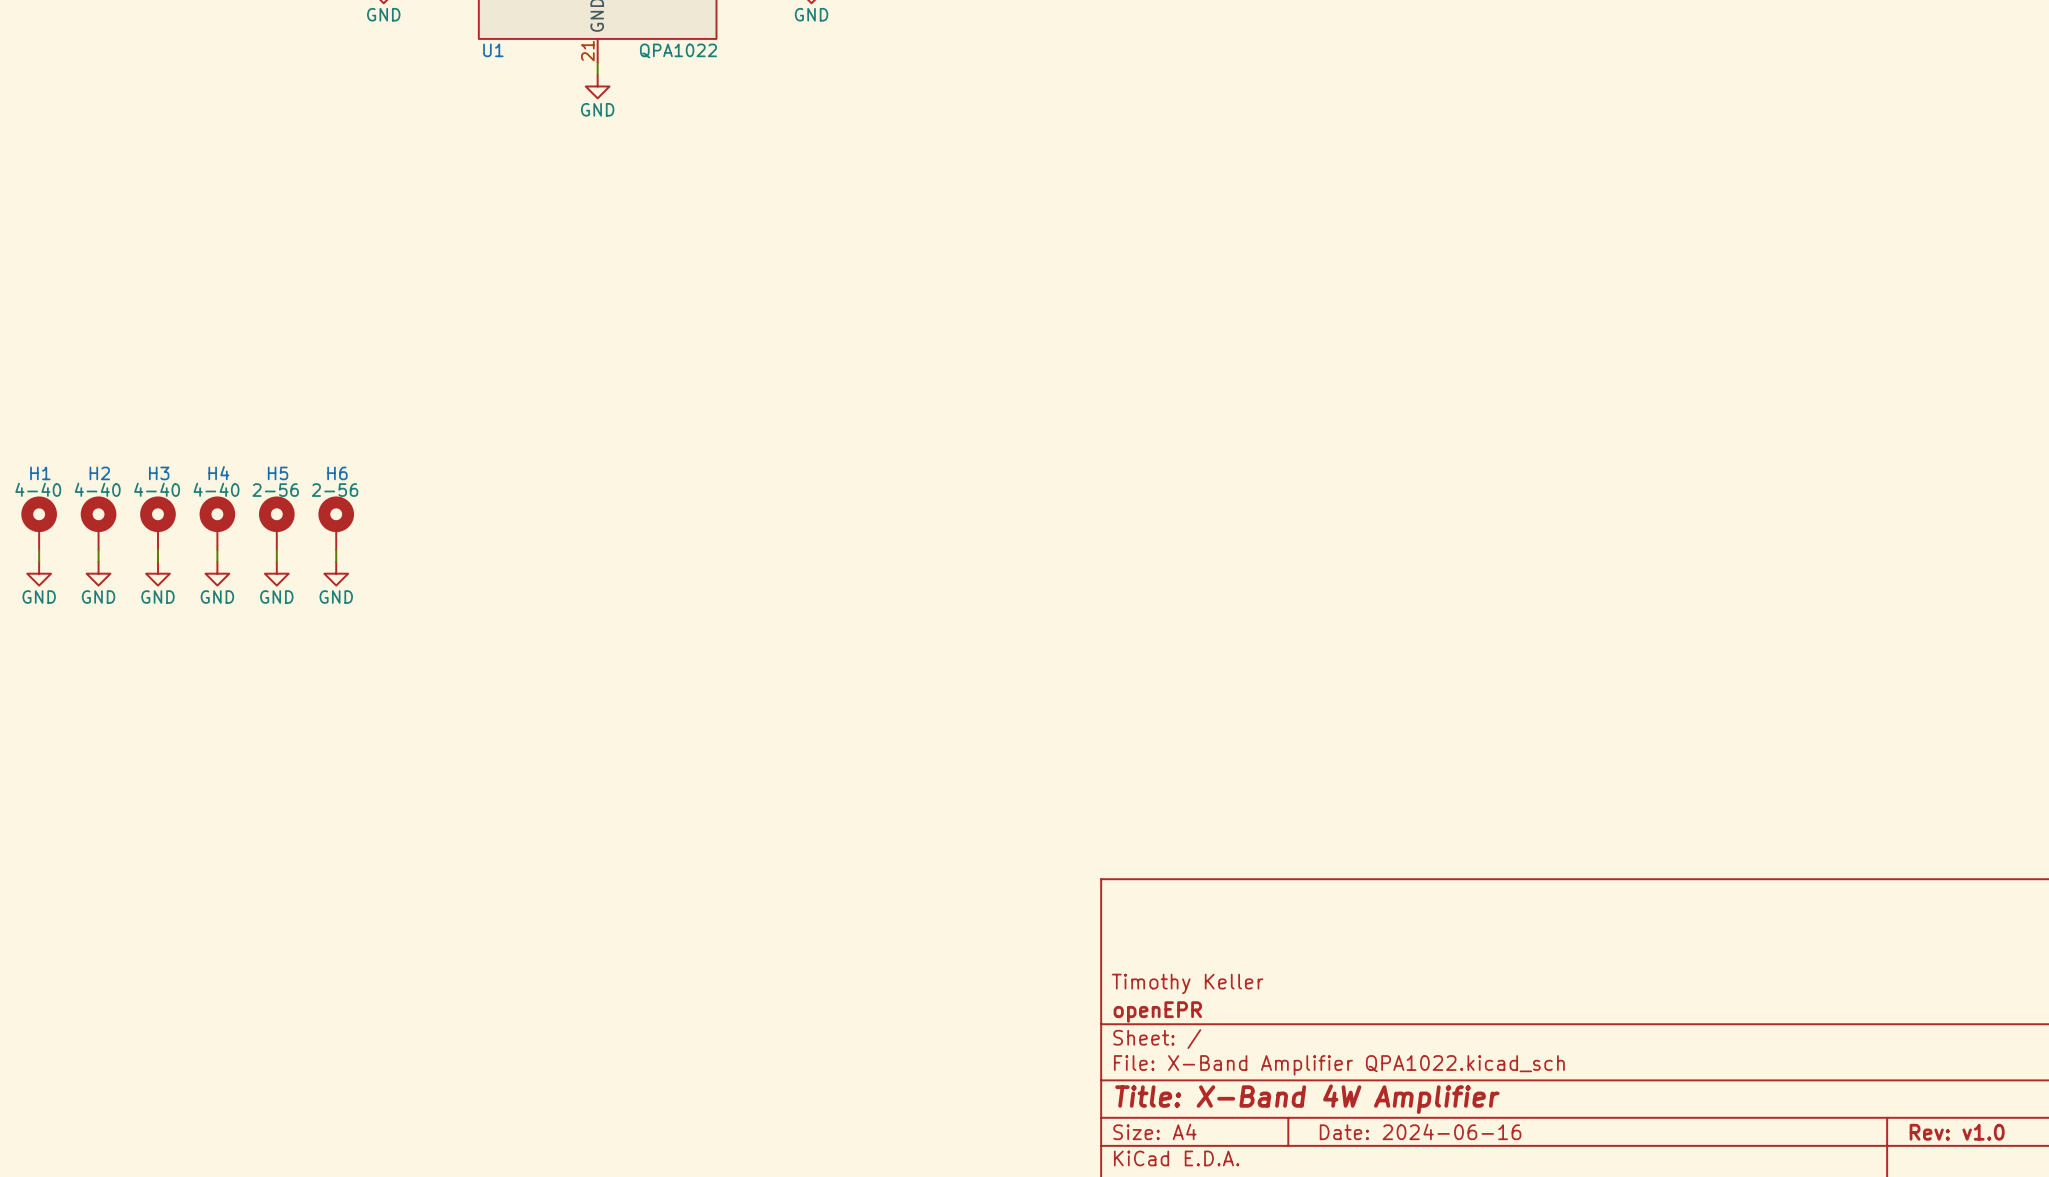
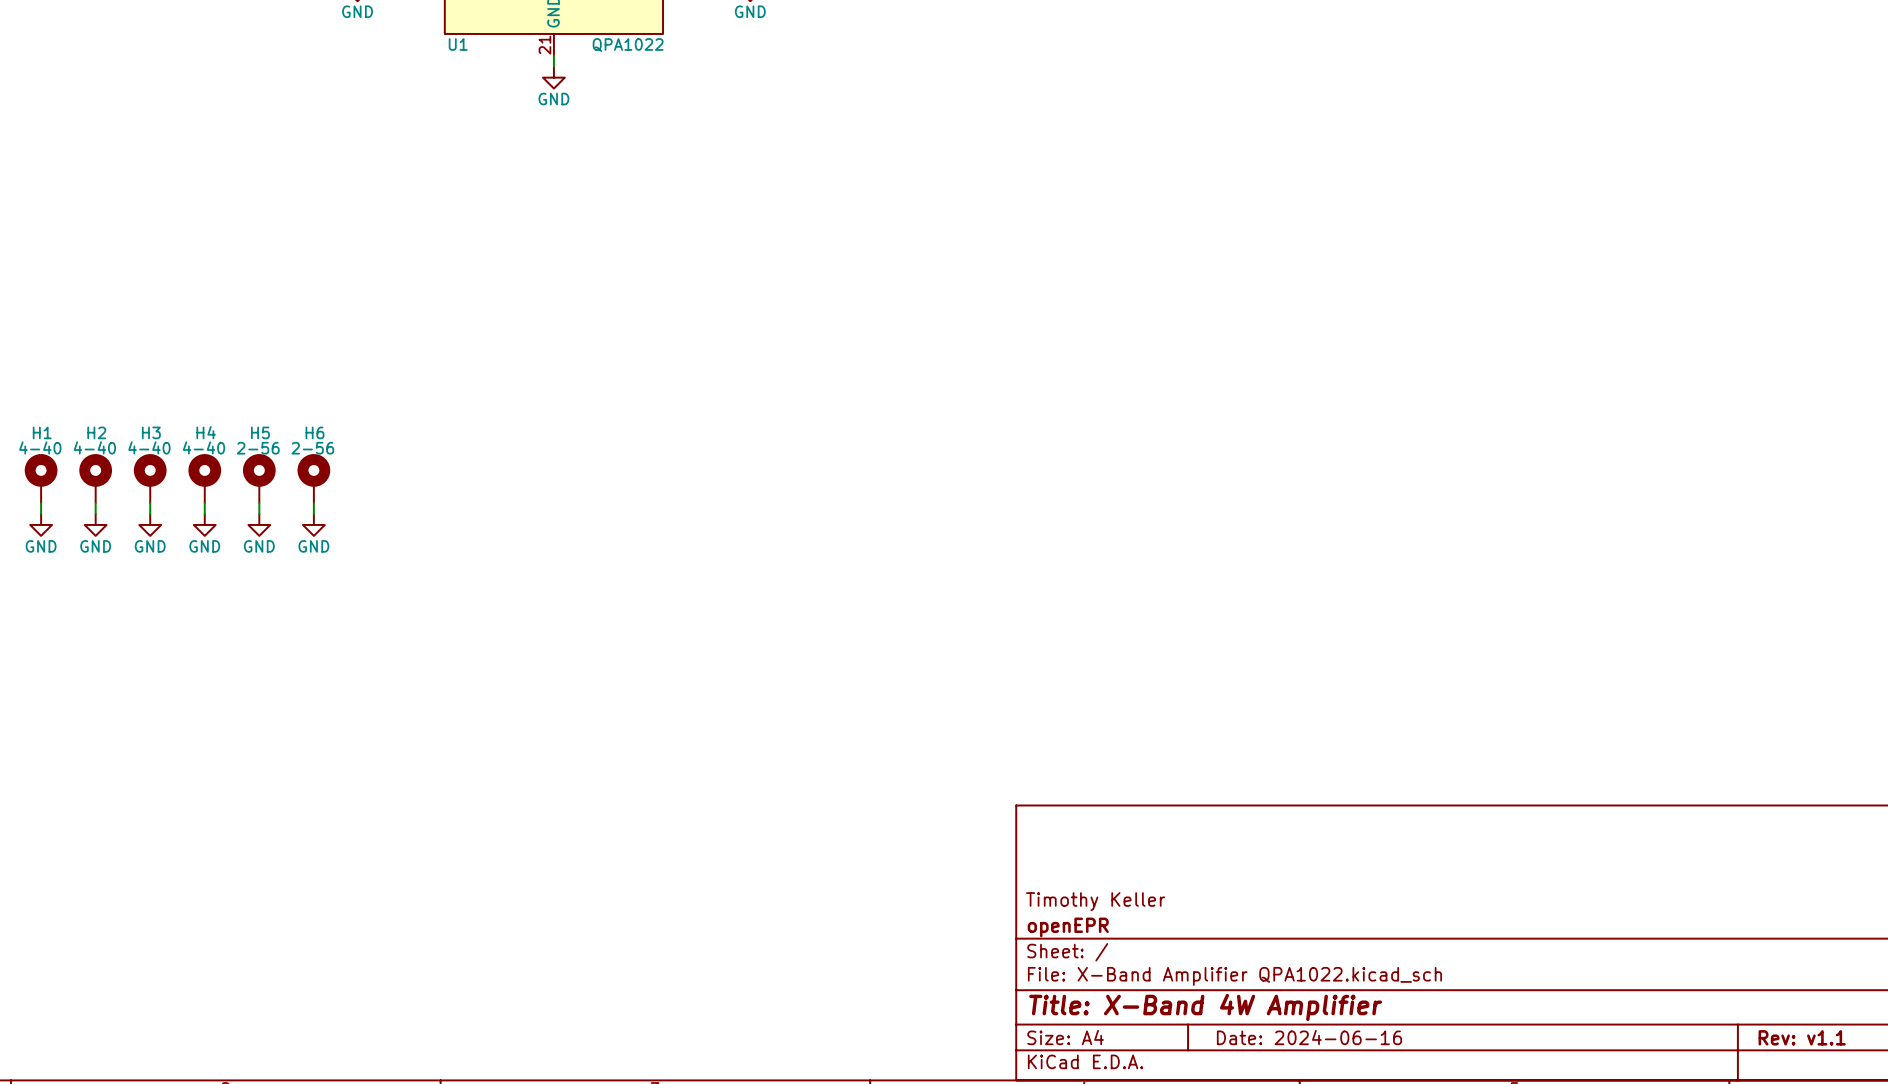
title block: Rev: v1.0 (1957, 1132) -> Rev: v1.1 (1802, 1037)

